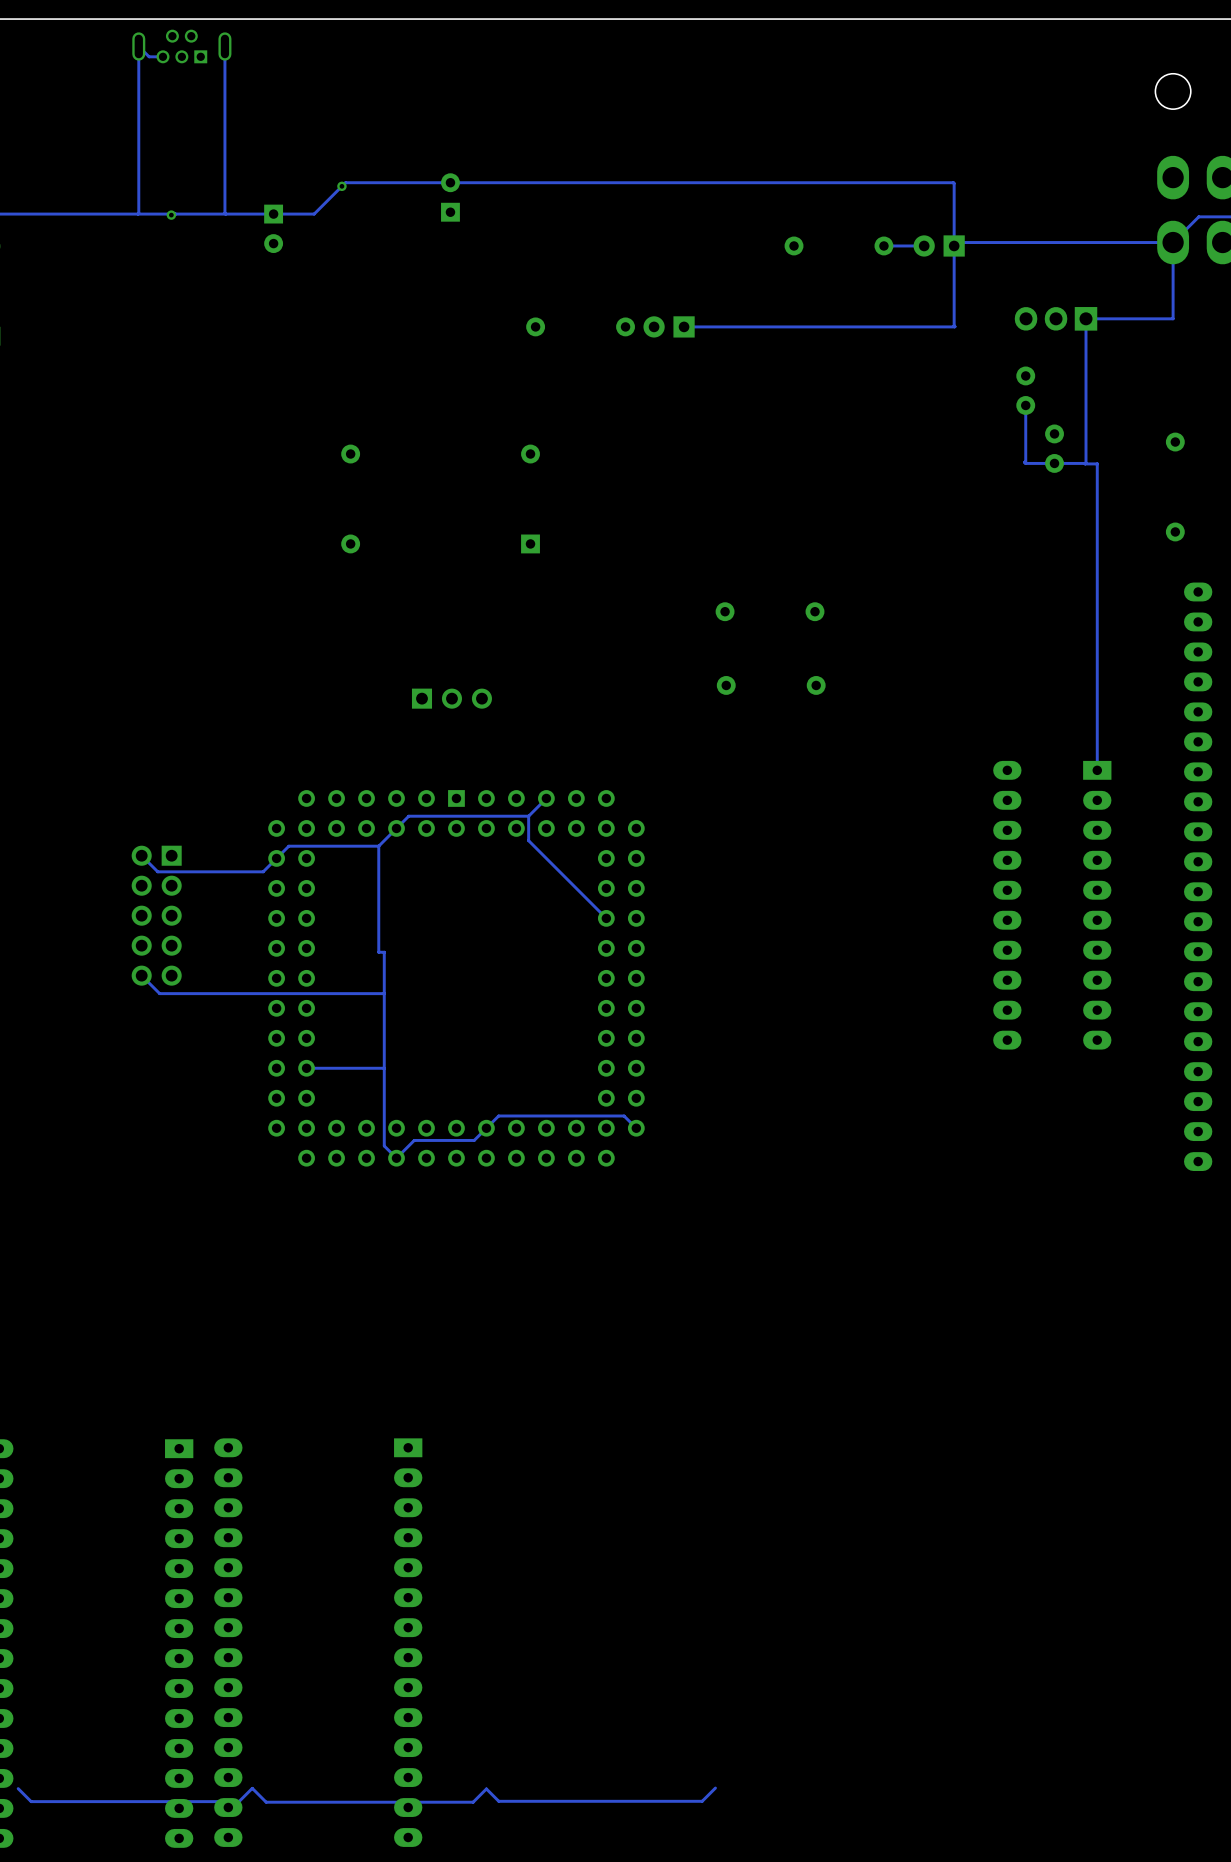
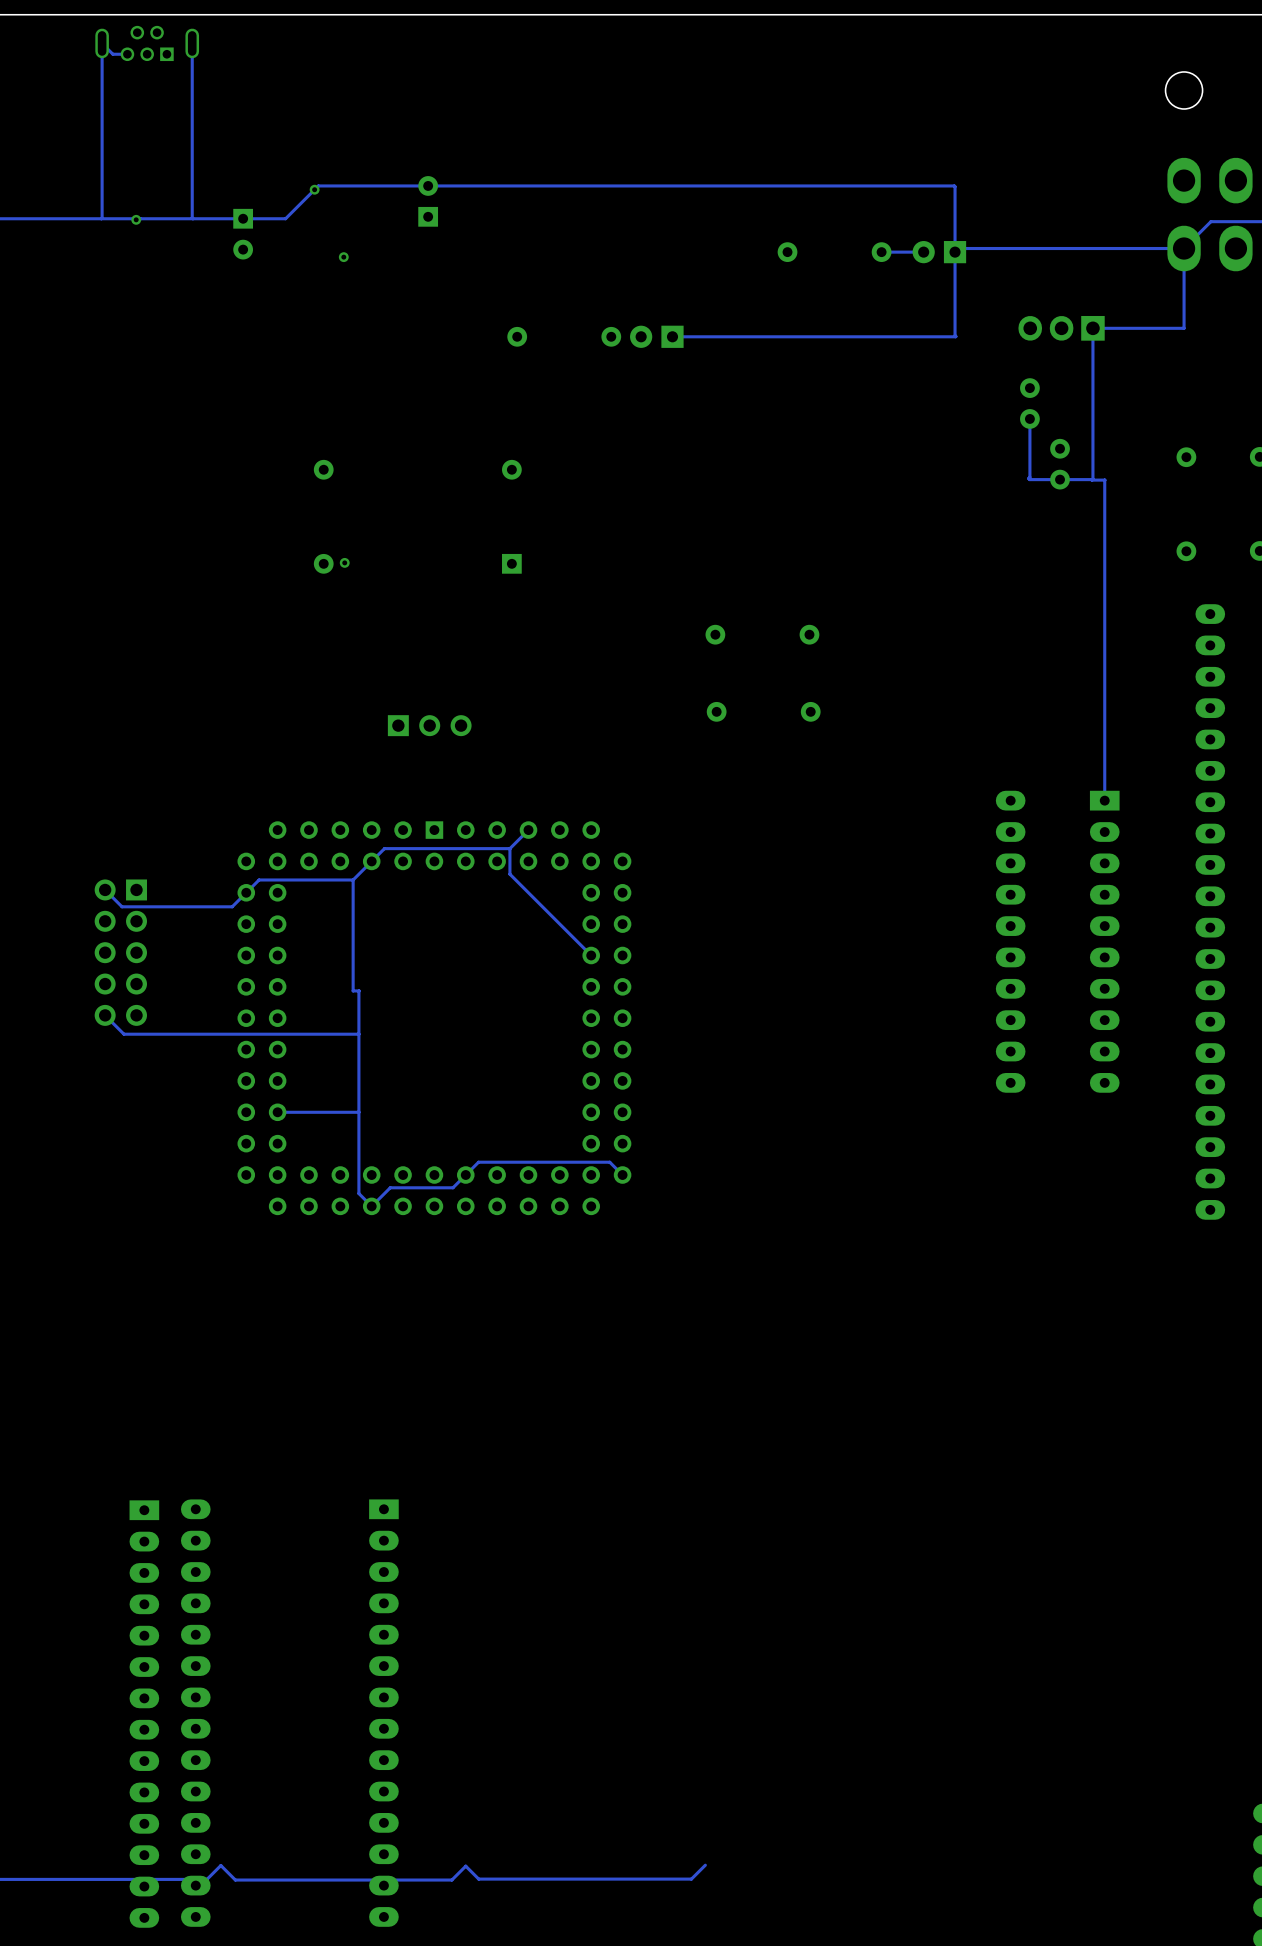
via: none -> (343, 257)
via: none -> (344, 562)

